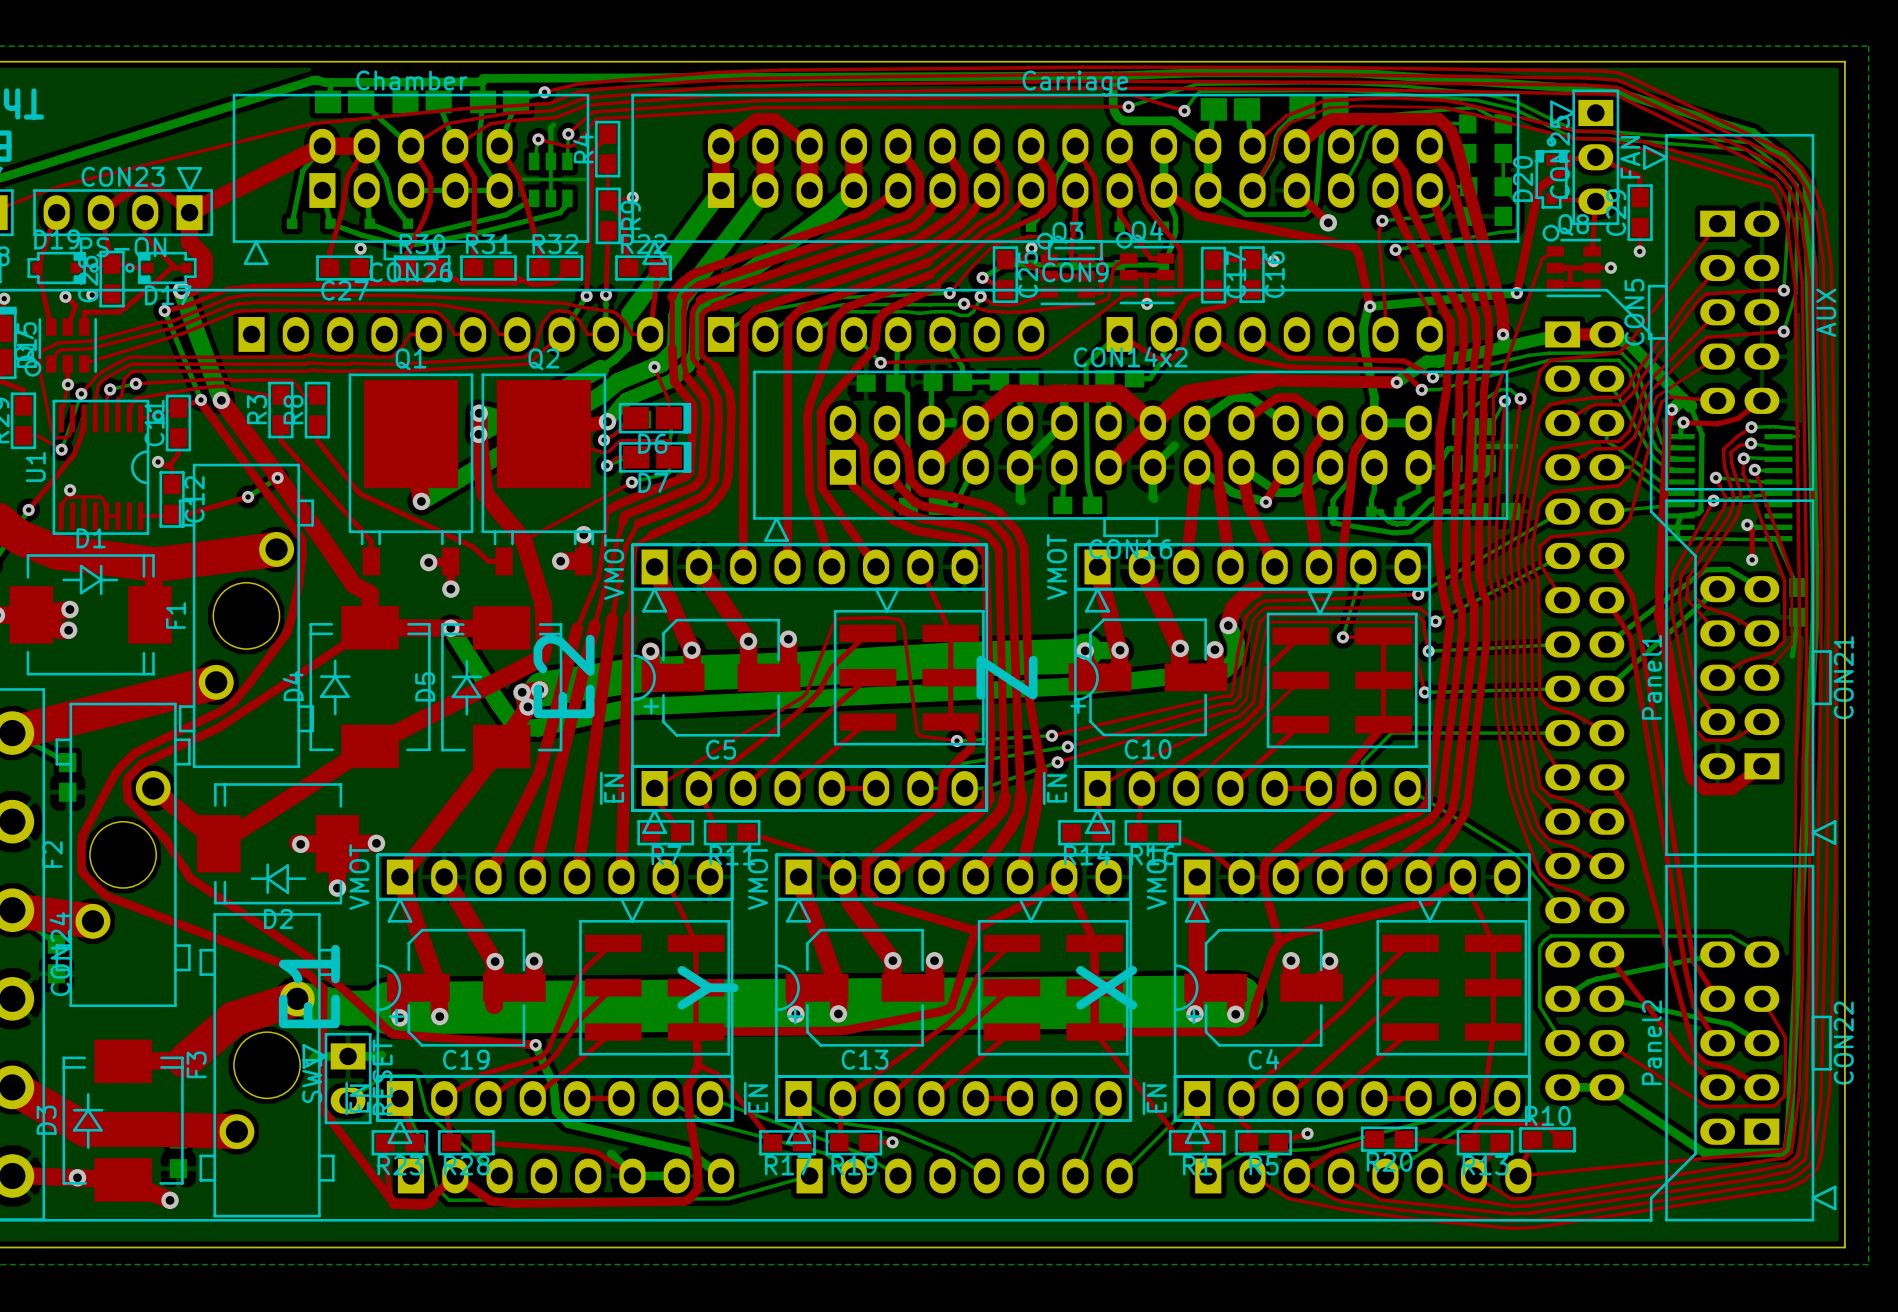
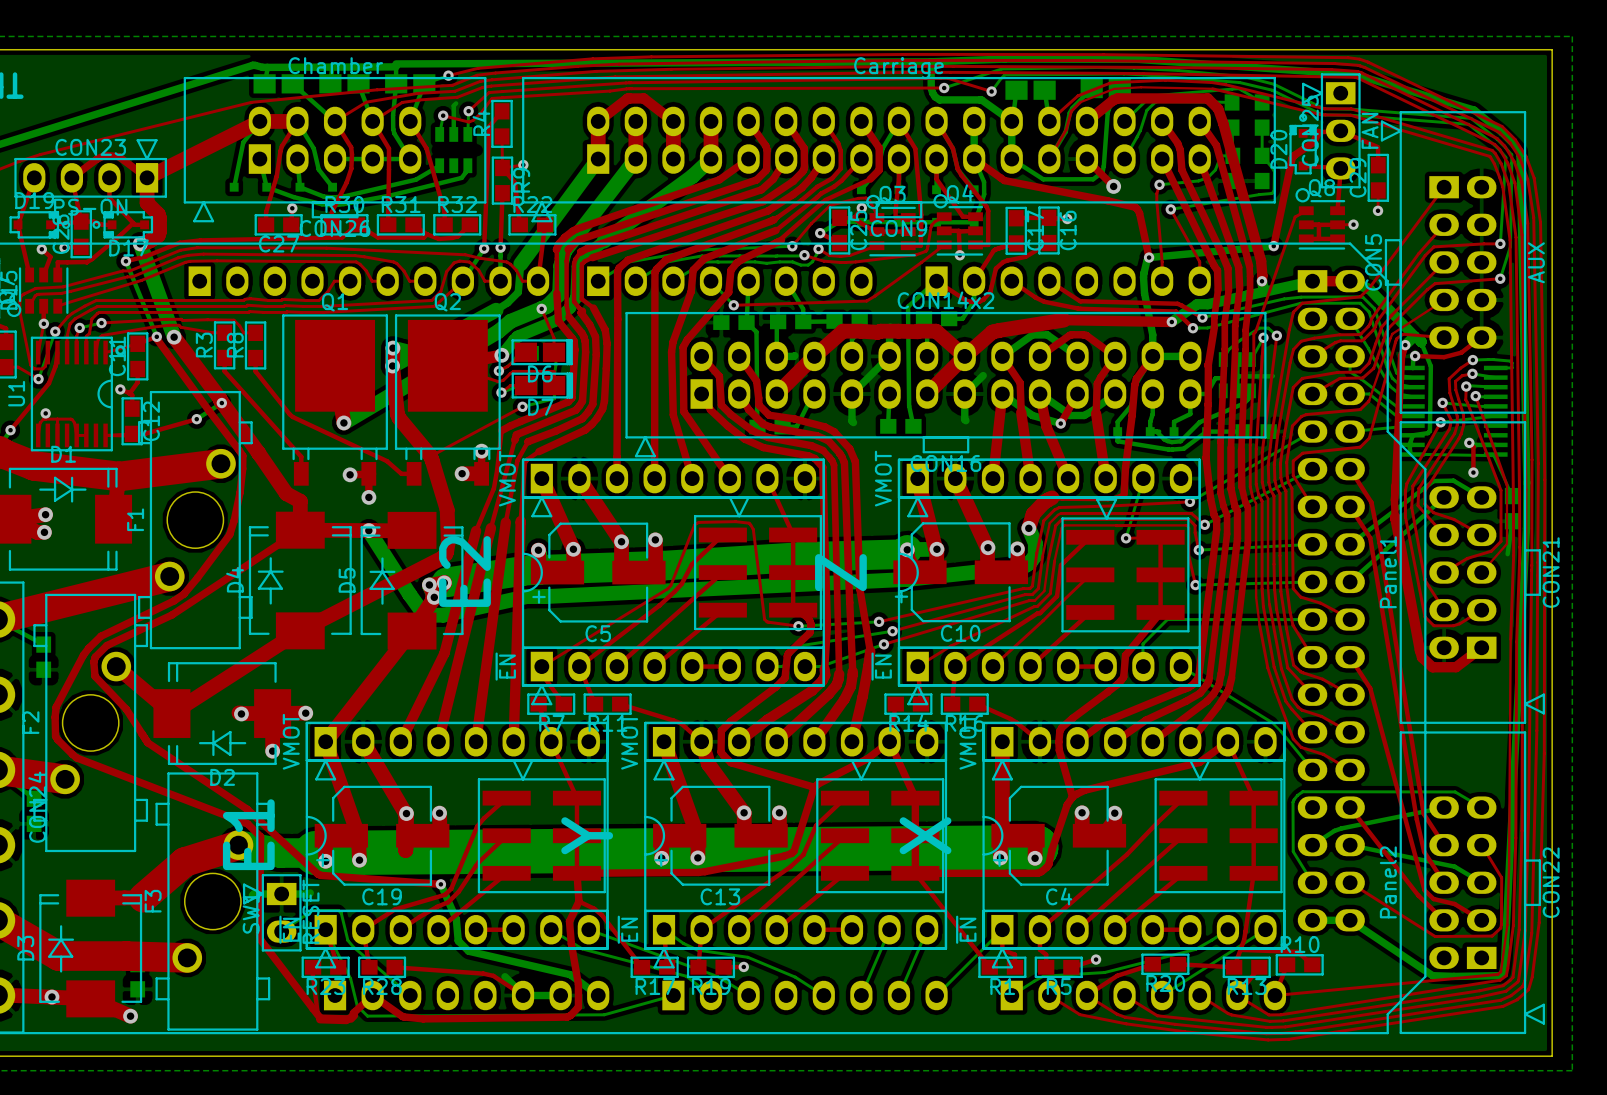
bottom track: (550, 161) (550, 198) -> none
bottom track: (520, 179) (584, 179) -> none

